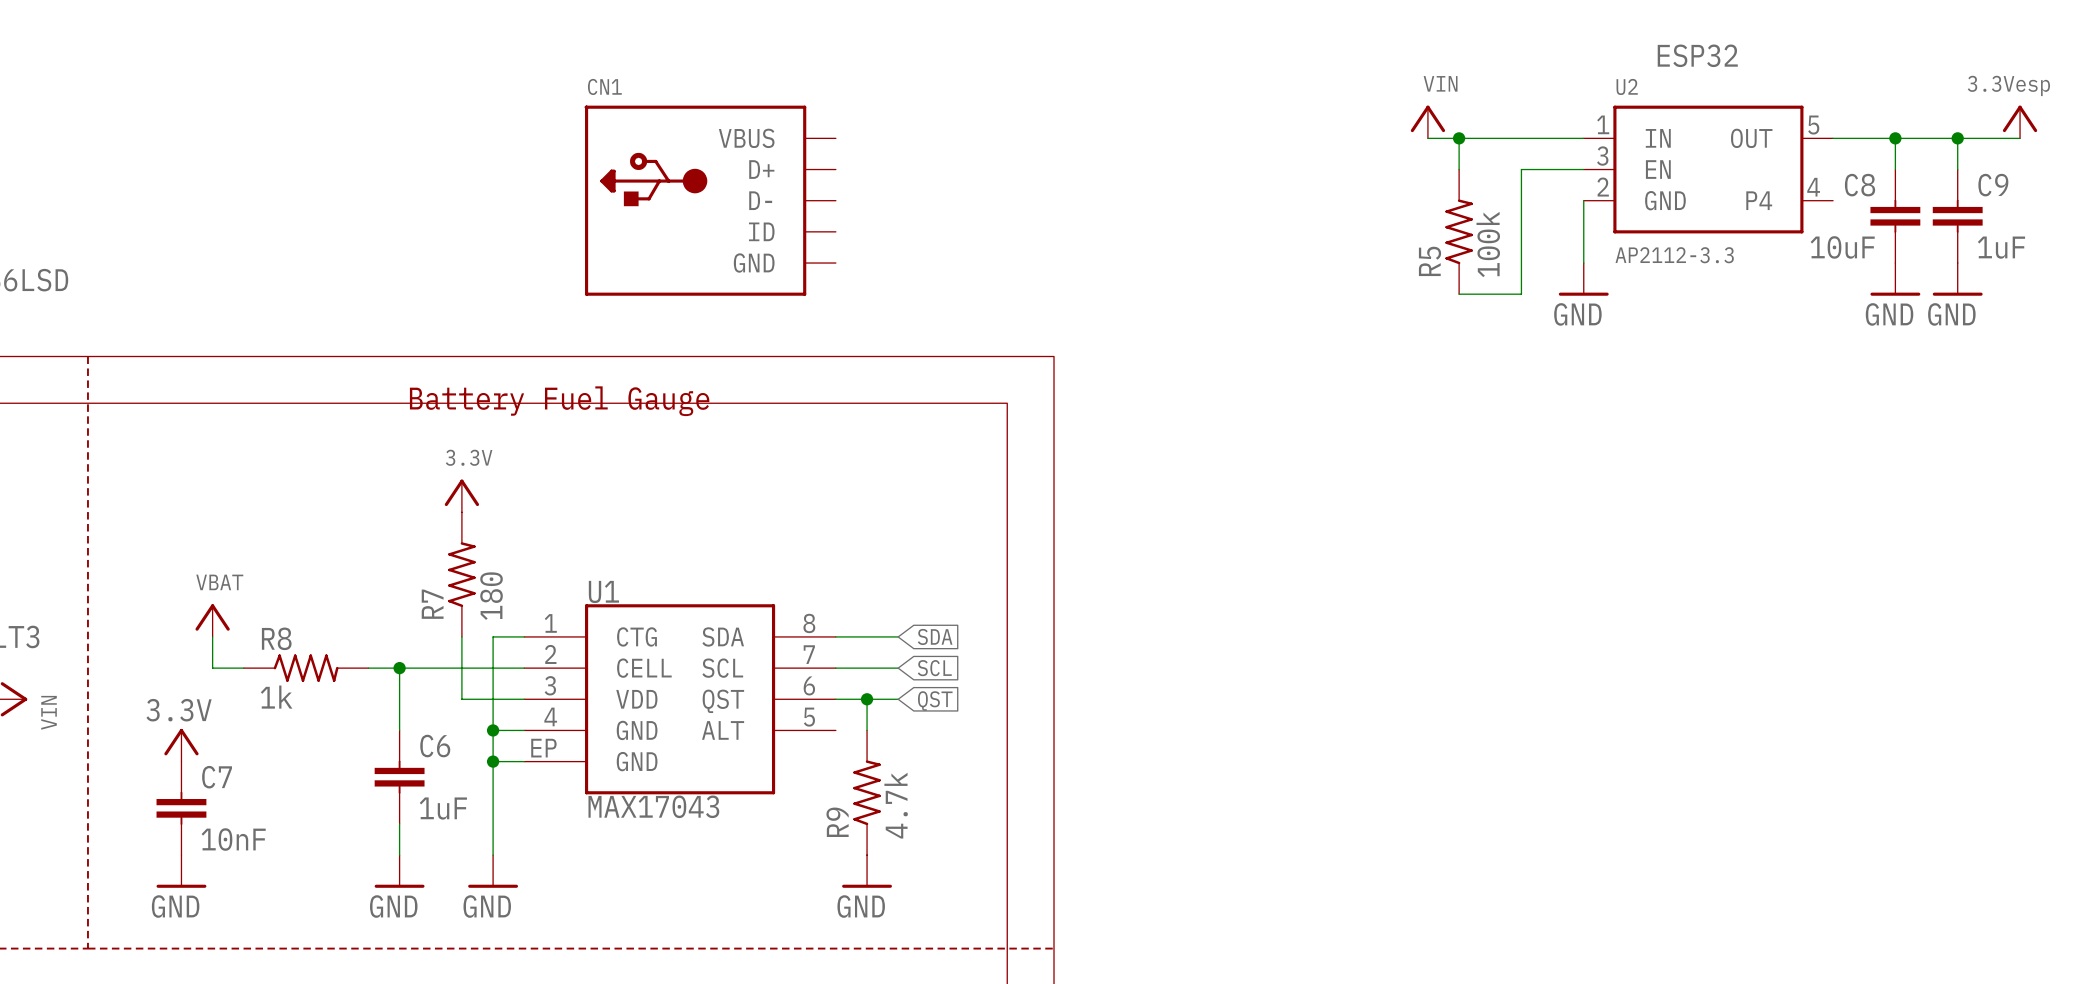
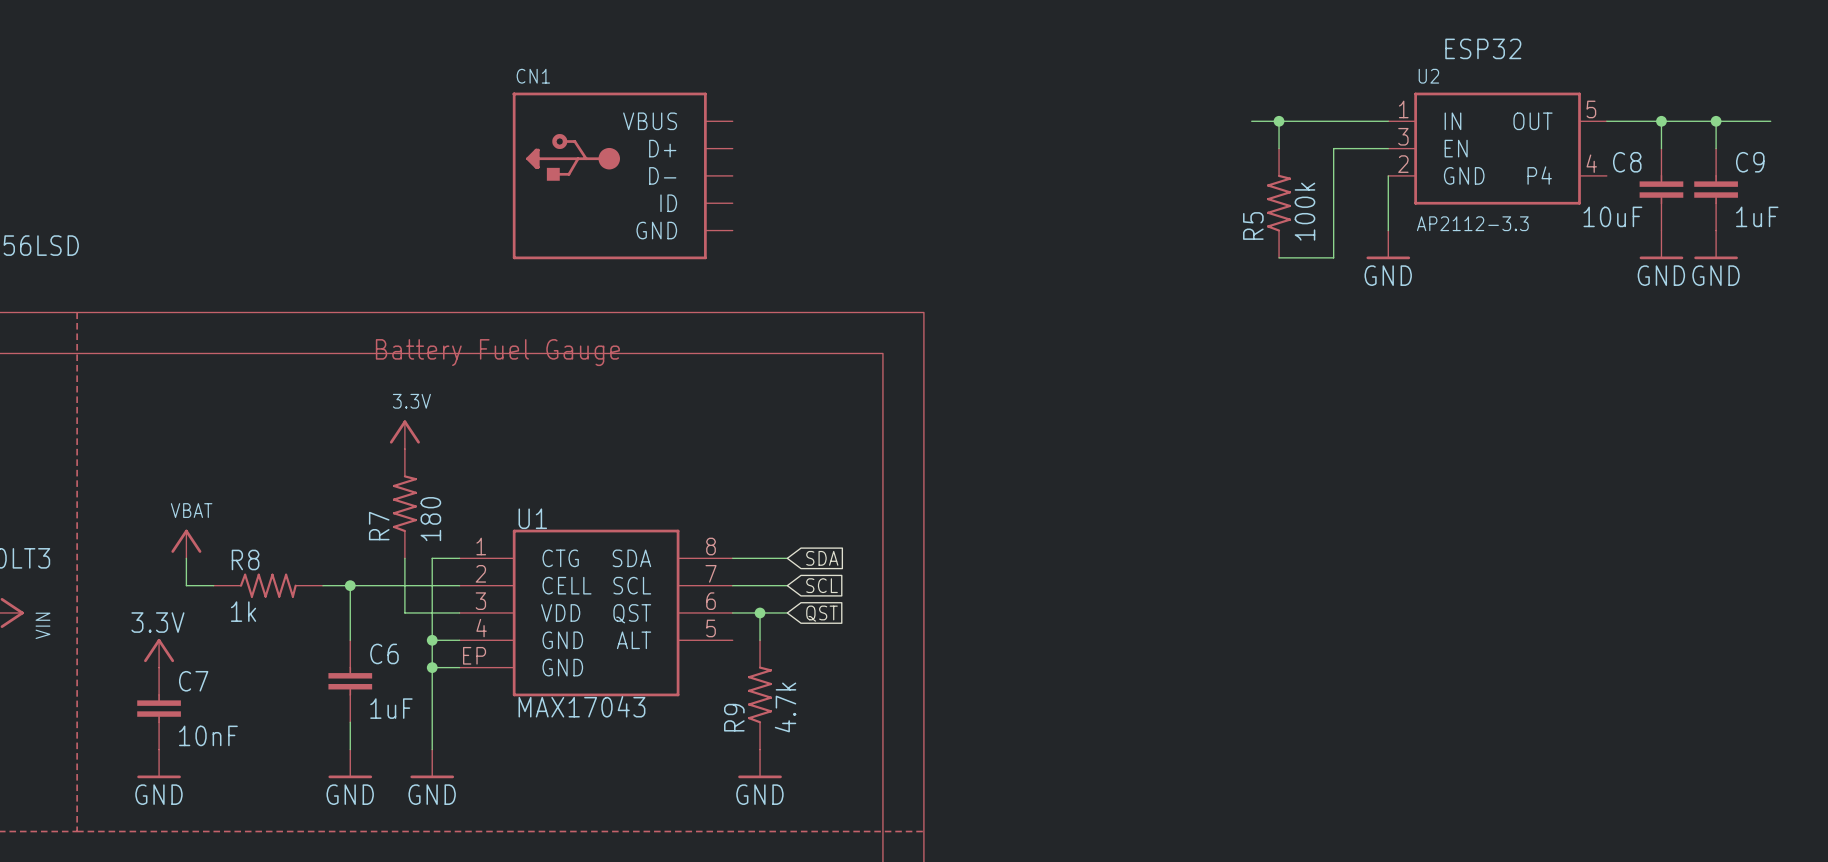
power symbol: VIN (1427, 122) -> none
power symbol: 3.3Vesp (2020, 122) -> none

